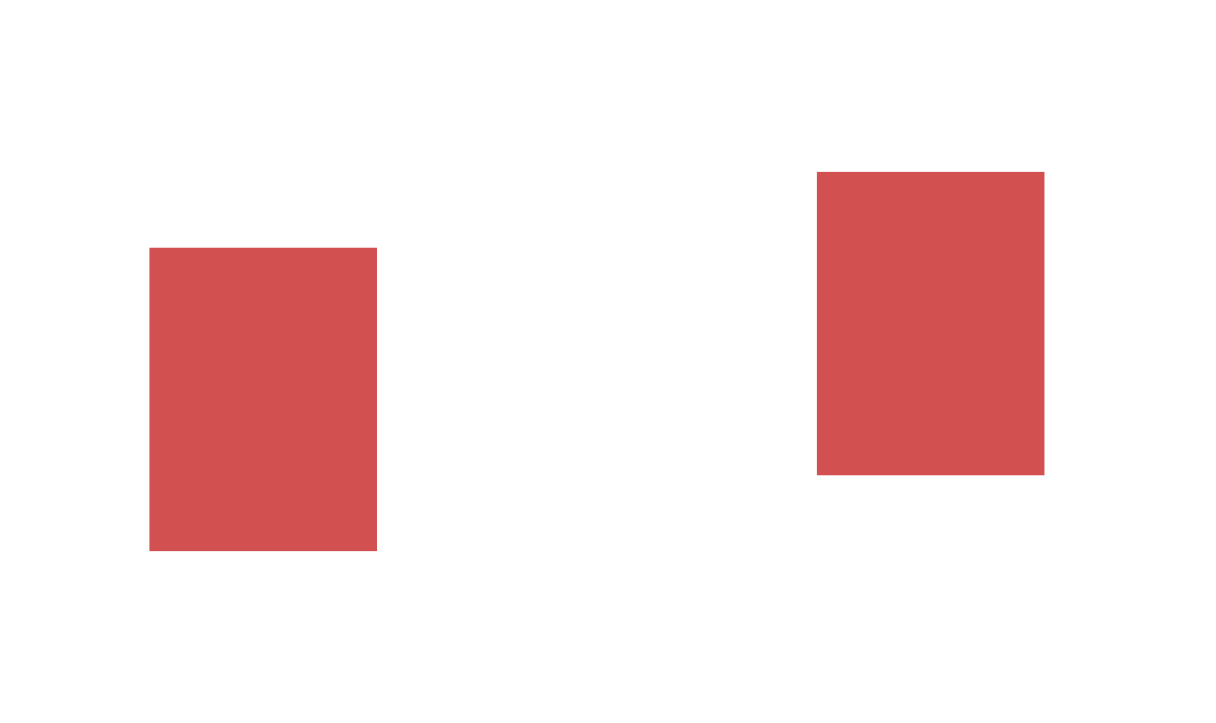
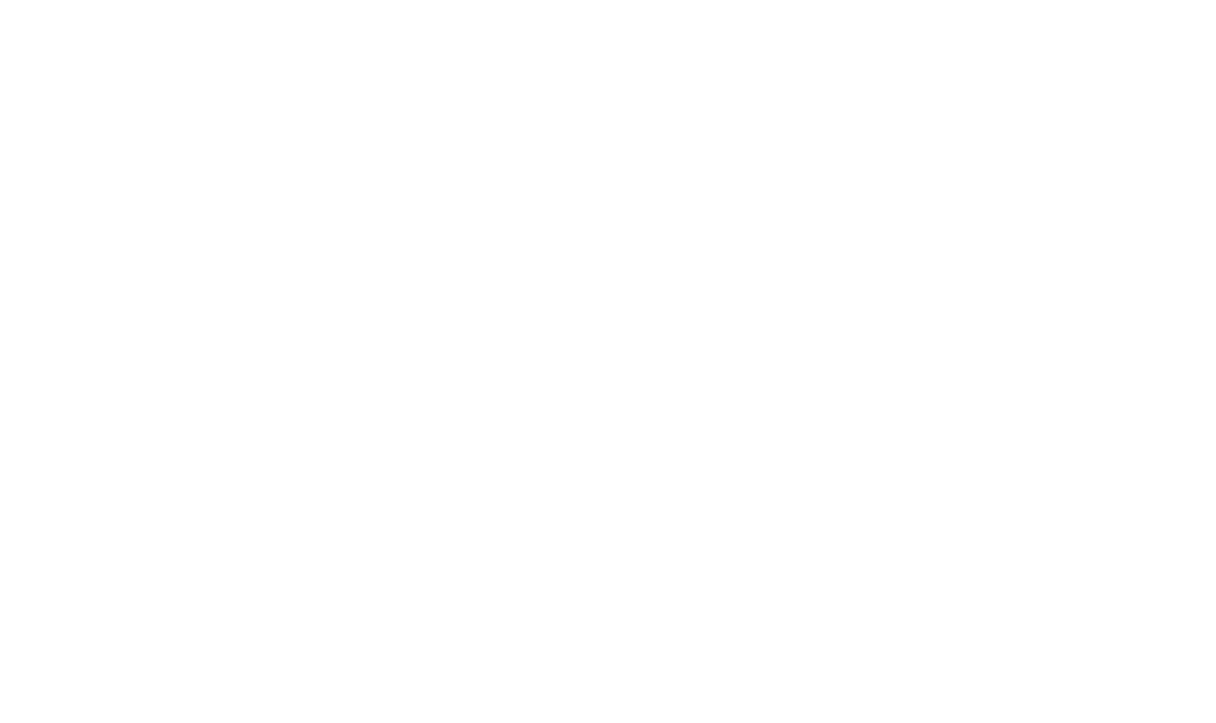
part: (930, 323) -> none
part: (263, 399) -> none

